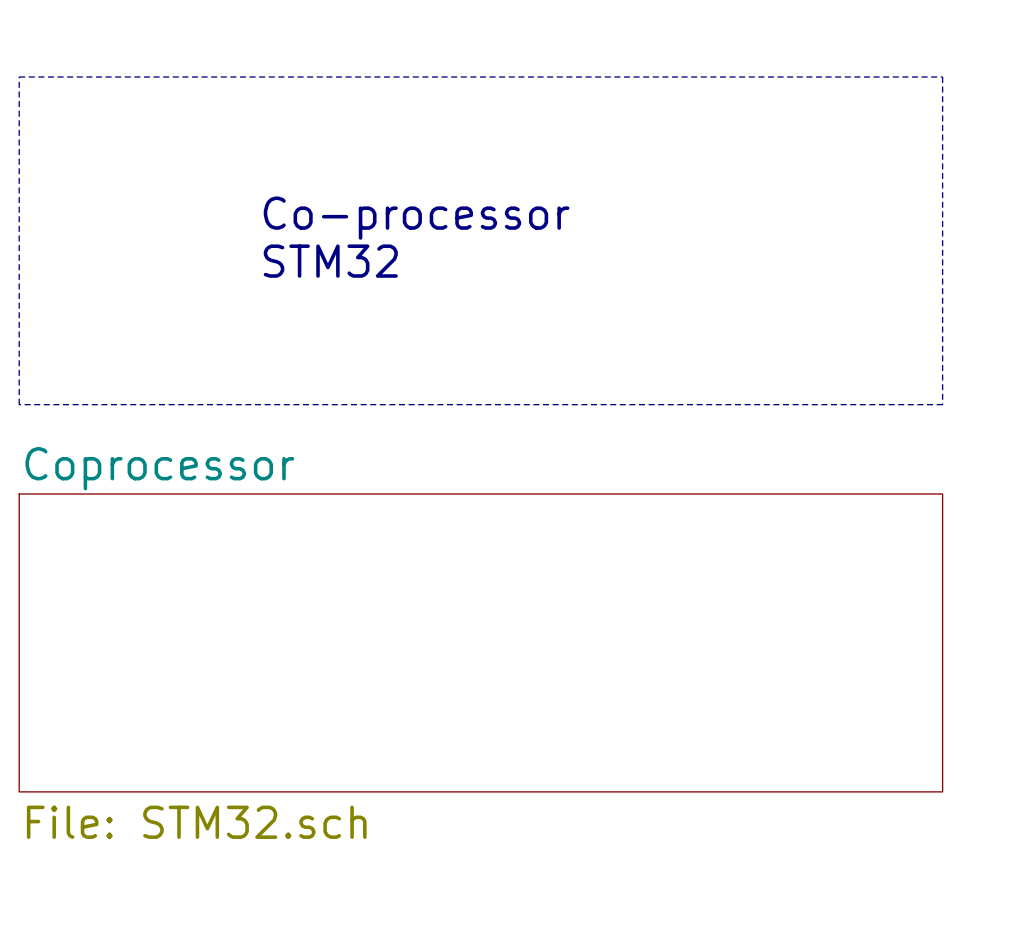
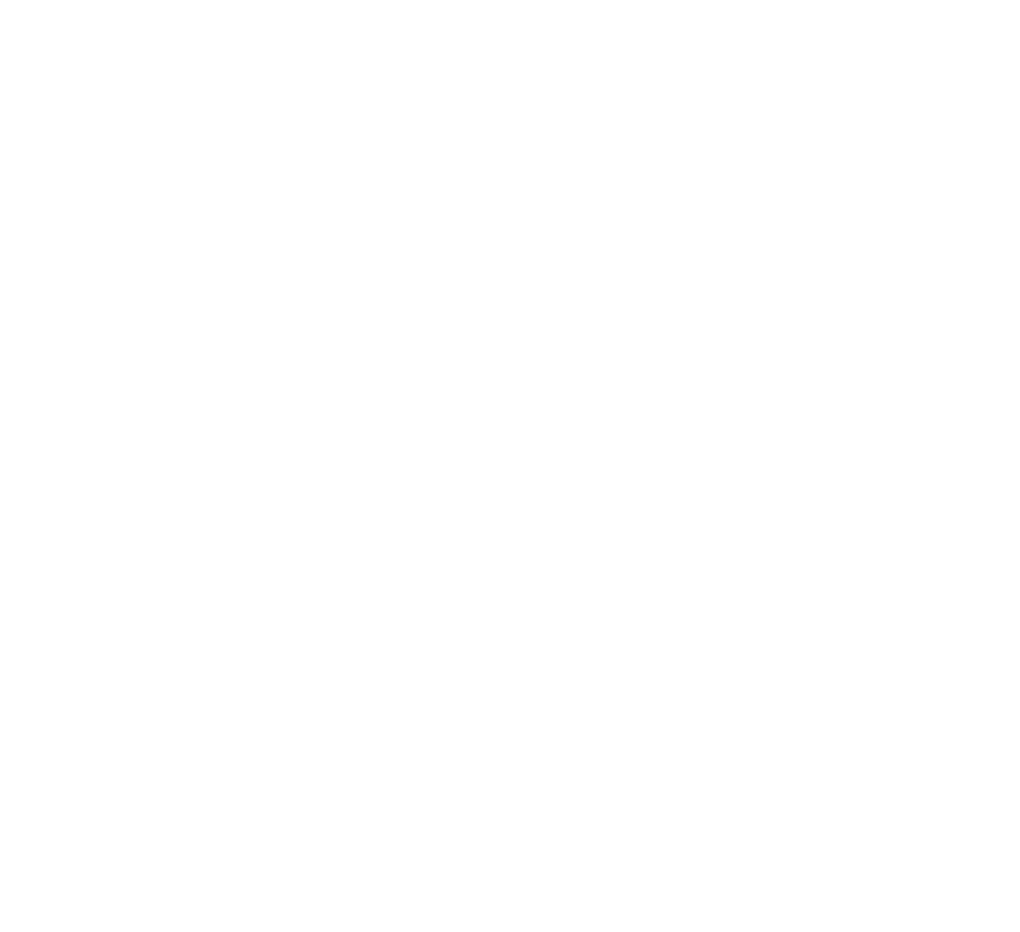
line: (19, 76) (19, 404) (942, 404) (942, 76) (19, 76) -> none
text: Co-processor (416, 218) -> none
text: STM32 (330, 261) -> none
sheet Coprocessor: File: STM32.sch (480, 642) -> none

